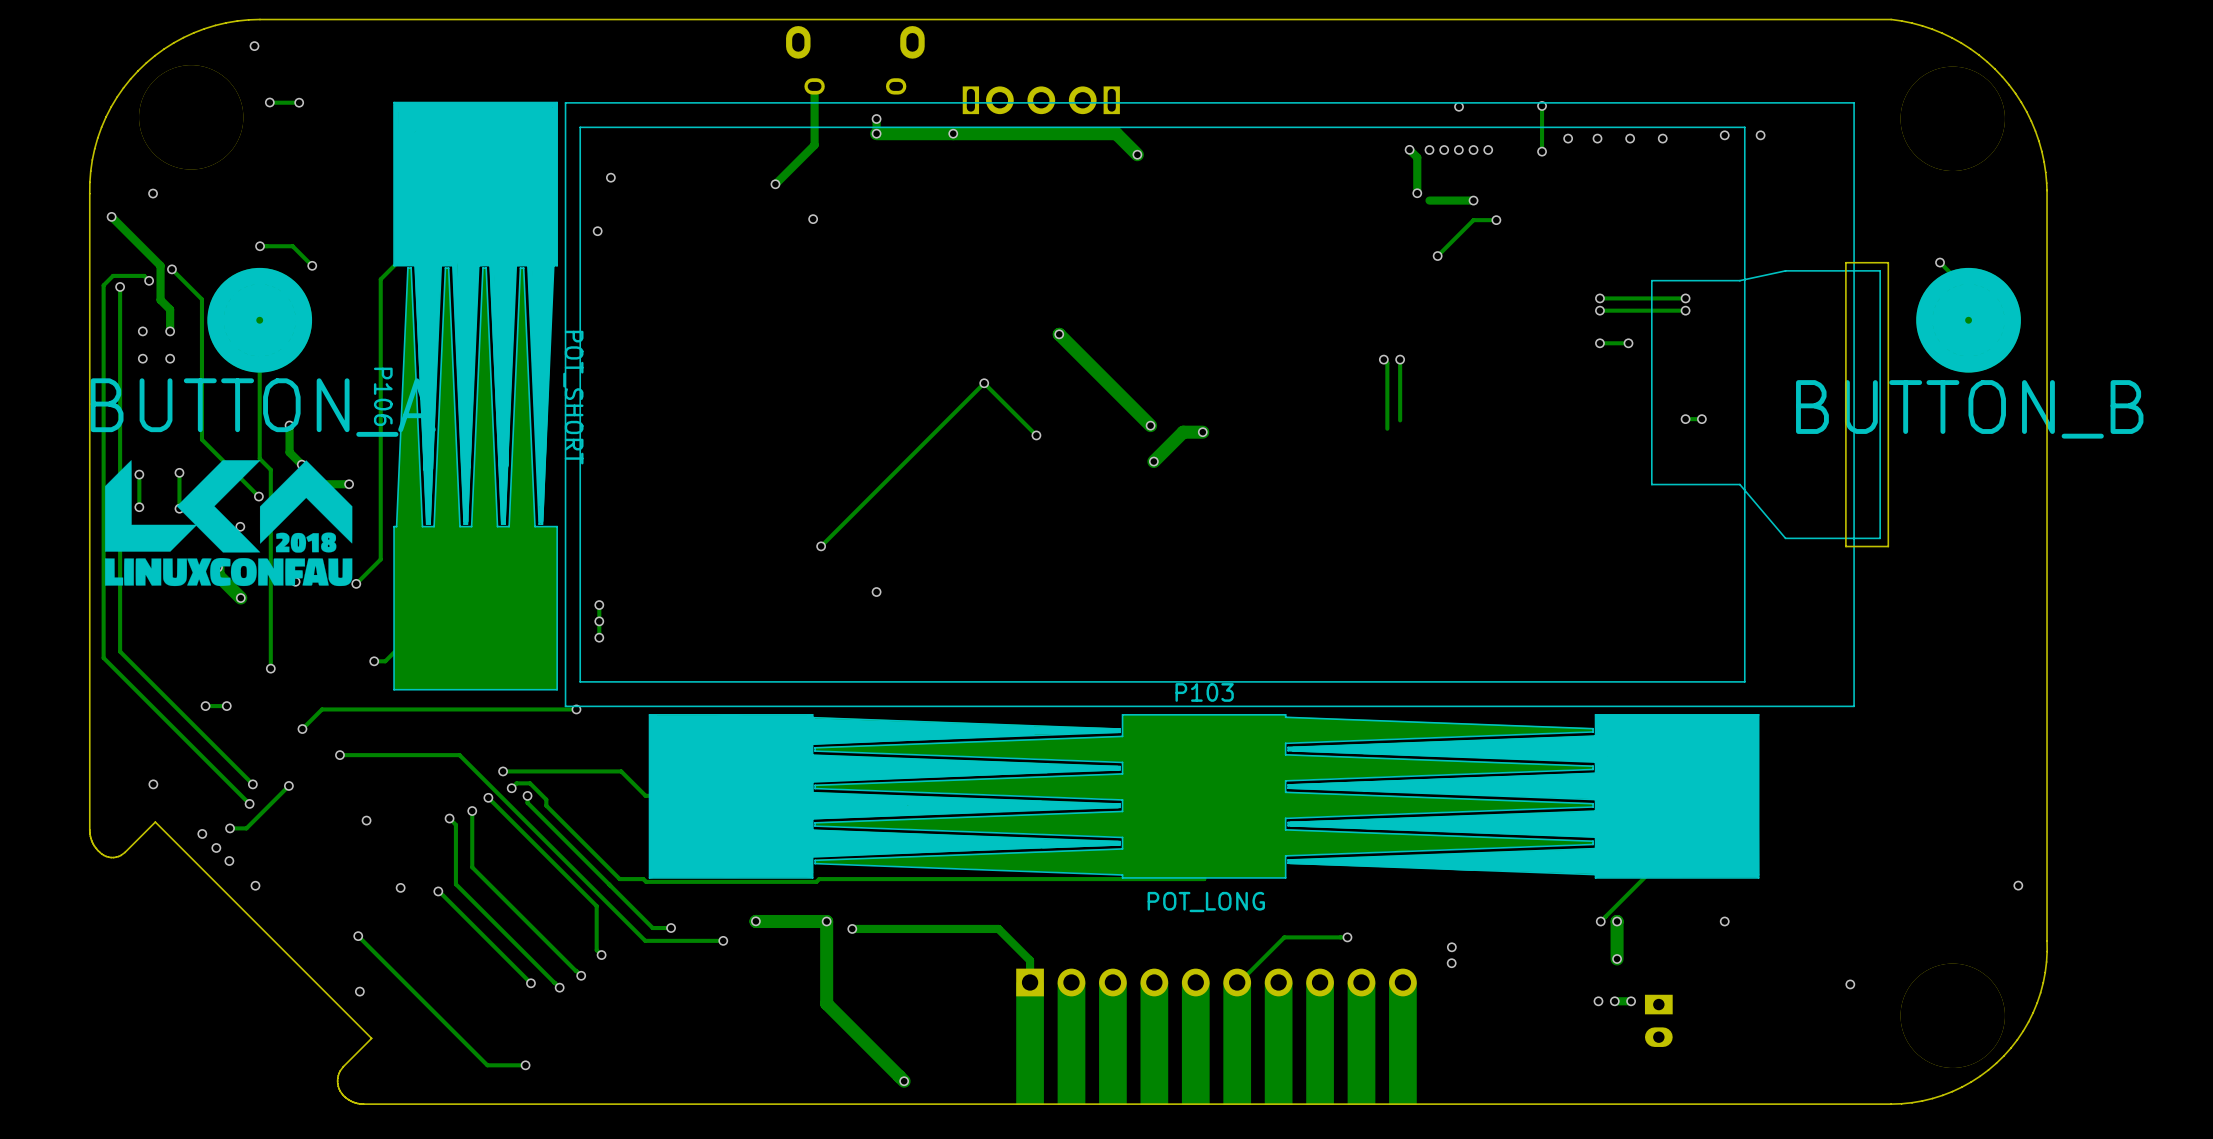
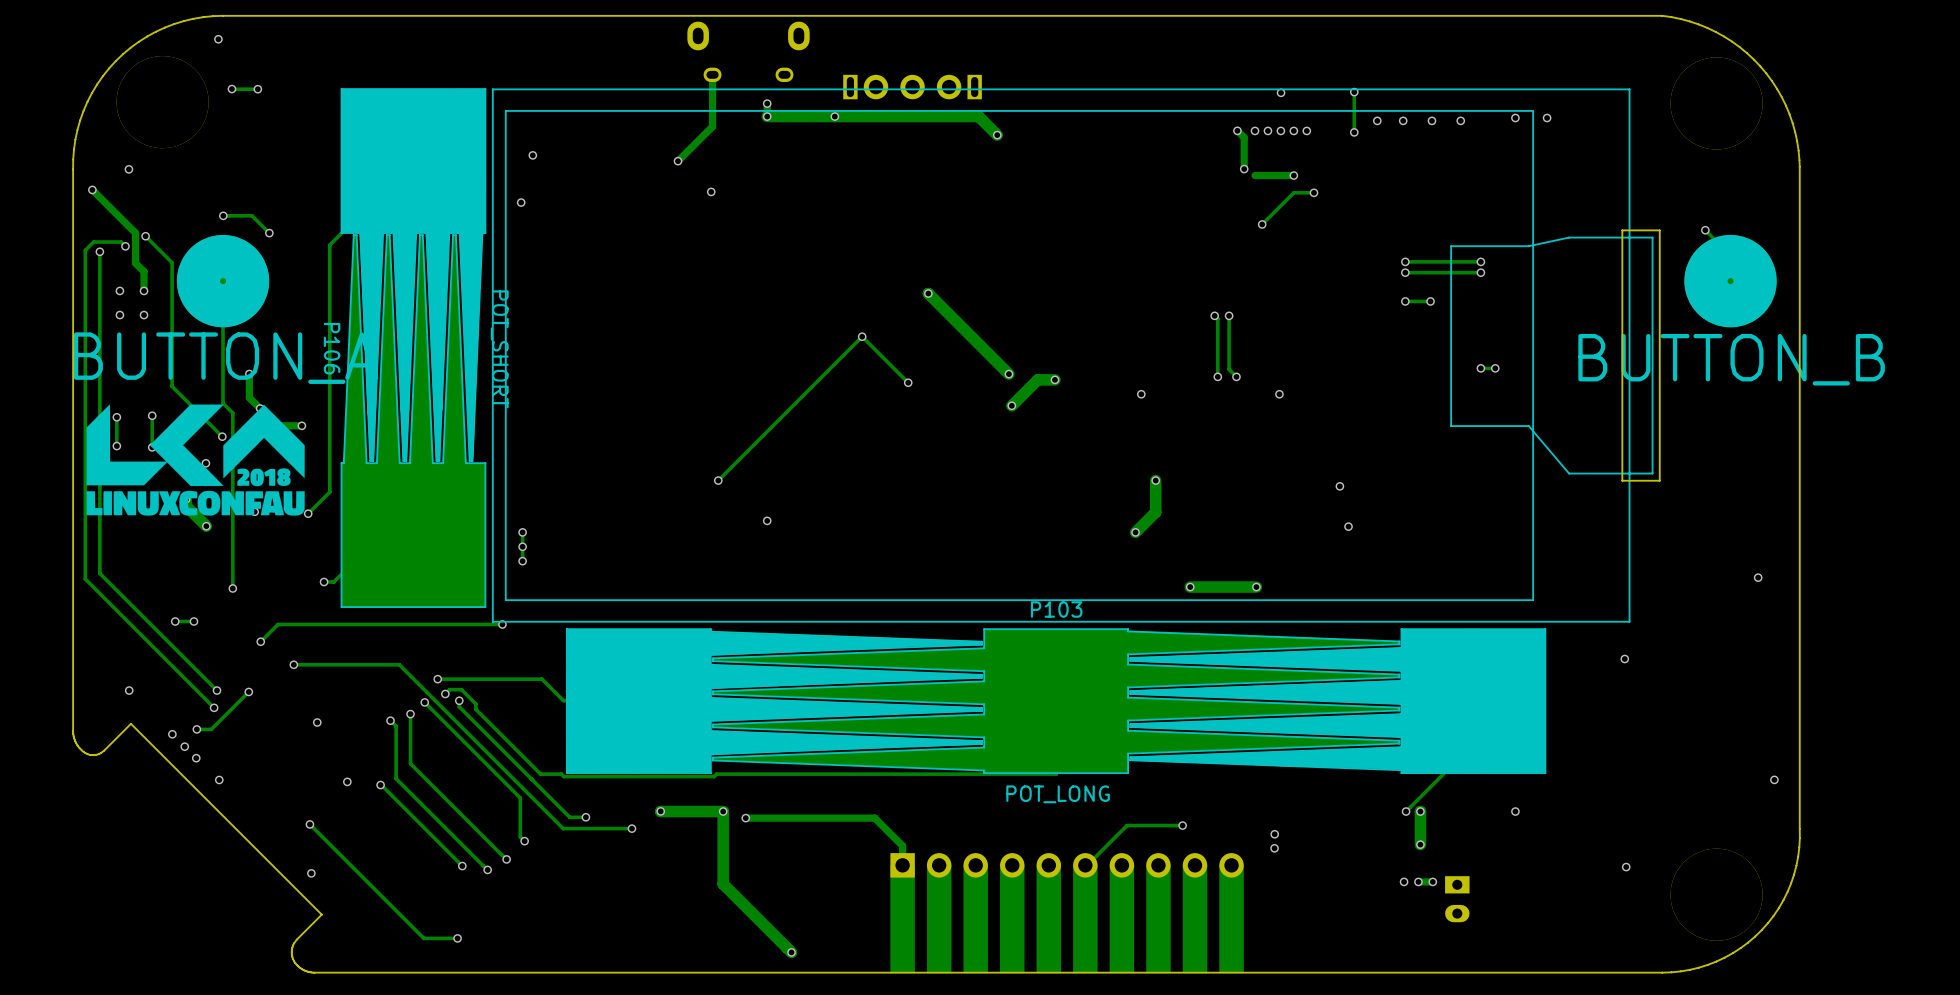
track: none -> (1229, 369) (1236, 376)
via: none -> (1217, 376)
via: none -> (1236, 376)
via: none -> (1141, 394)
via: none -> (1279, 394)
track: none -> (1155, 480) (1155, 512) (1135, 532)
via: none -> (1155, 480)
via: none -> (1339, 486)
via: none -> (1348, 526)
via: none -> (1135, 532)
via: none -> (1758, 577)
via: none -> (1190, 587)
track: none -> (1256, 587) (1190, 587)
via: none -> (1256, 587)
via: none -> (1624, 659)

